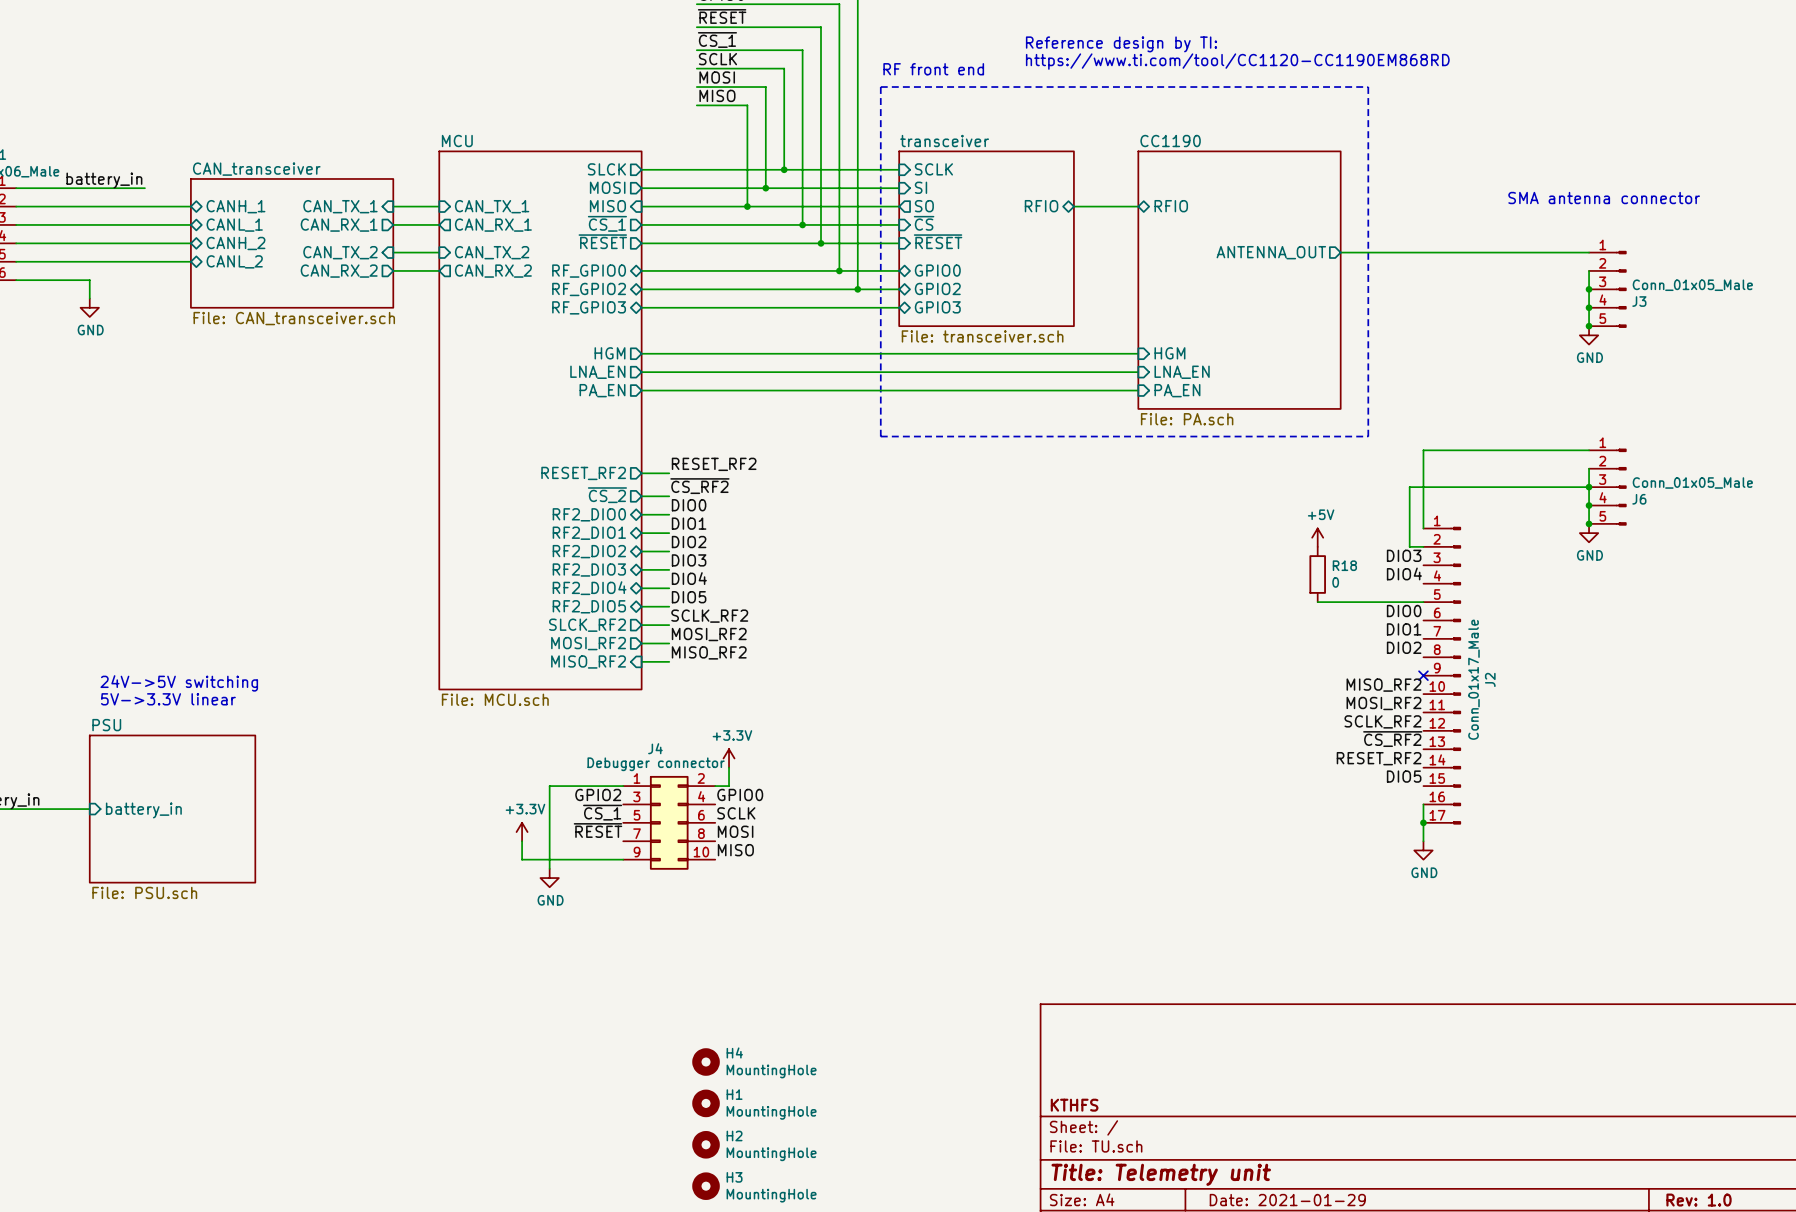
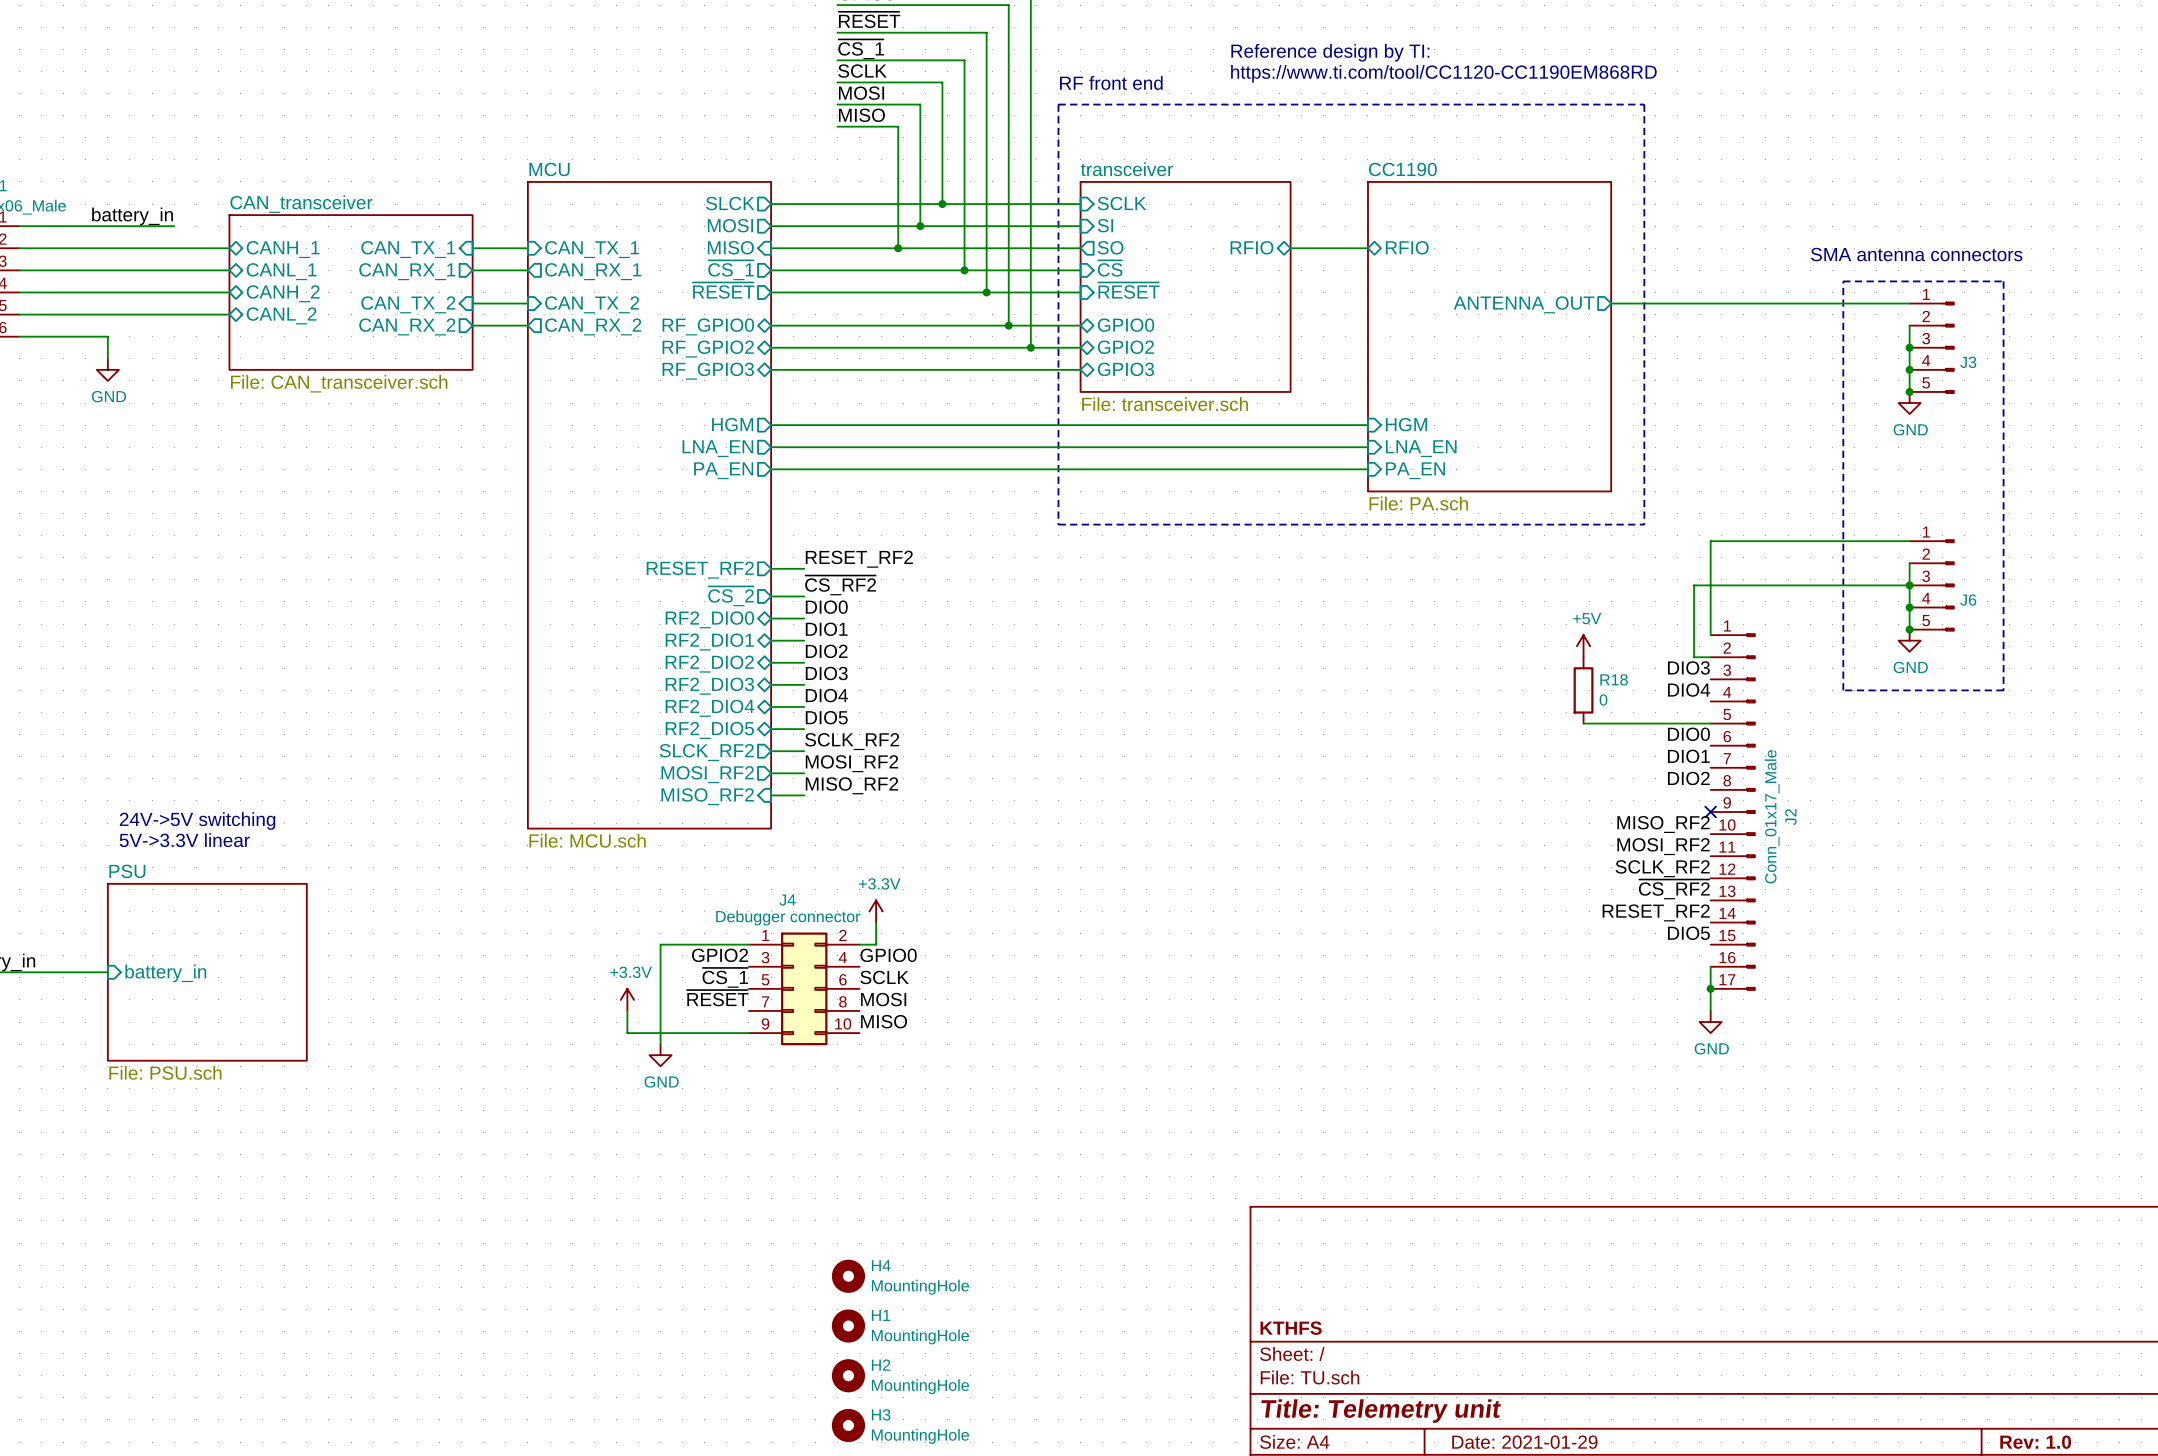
text: SMA antenna connector (1604, 198) -> SMA antenna connectors (1916, 254)
line: none -> (1843, 281) (1843, 690) (2003, 690) (2003, 281) (1843, 281)
J3 value: Conn_01x05_Male (1692, 285) -> none
J6 value: Conn_01x05_Male (1692, 482) -> none

